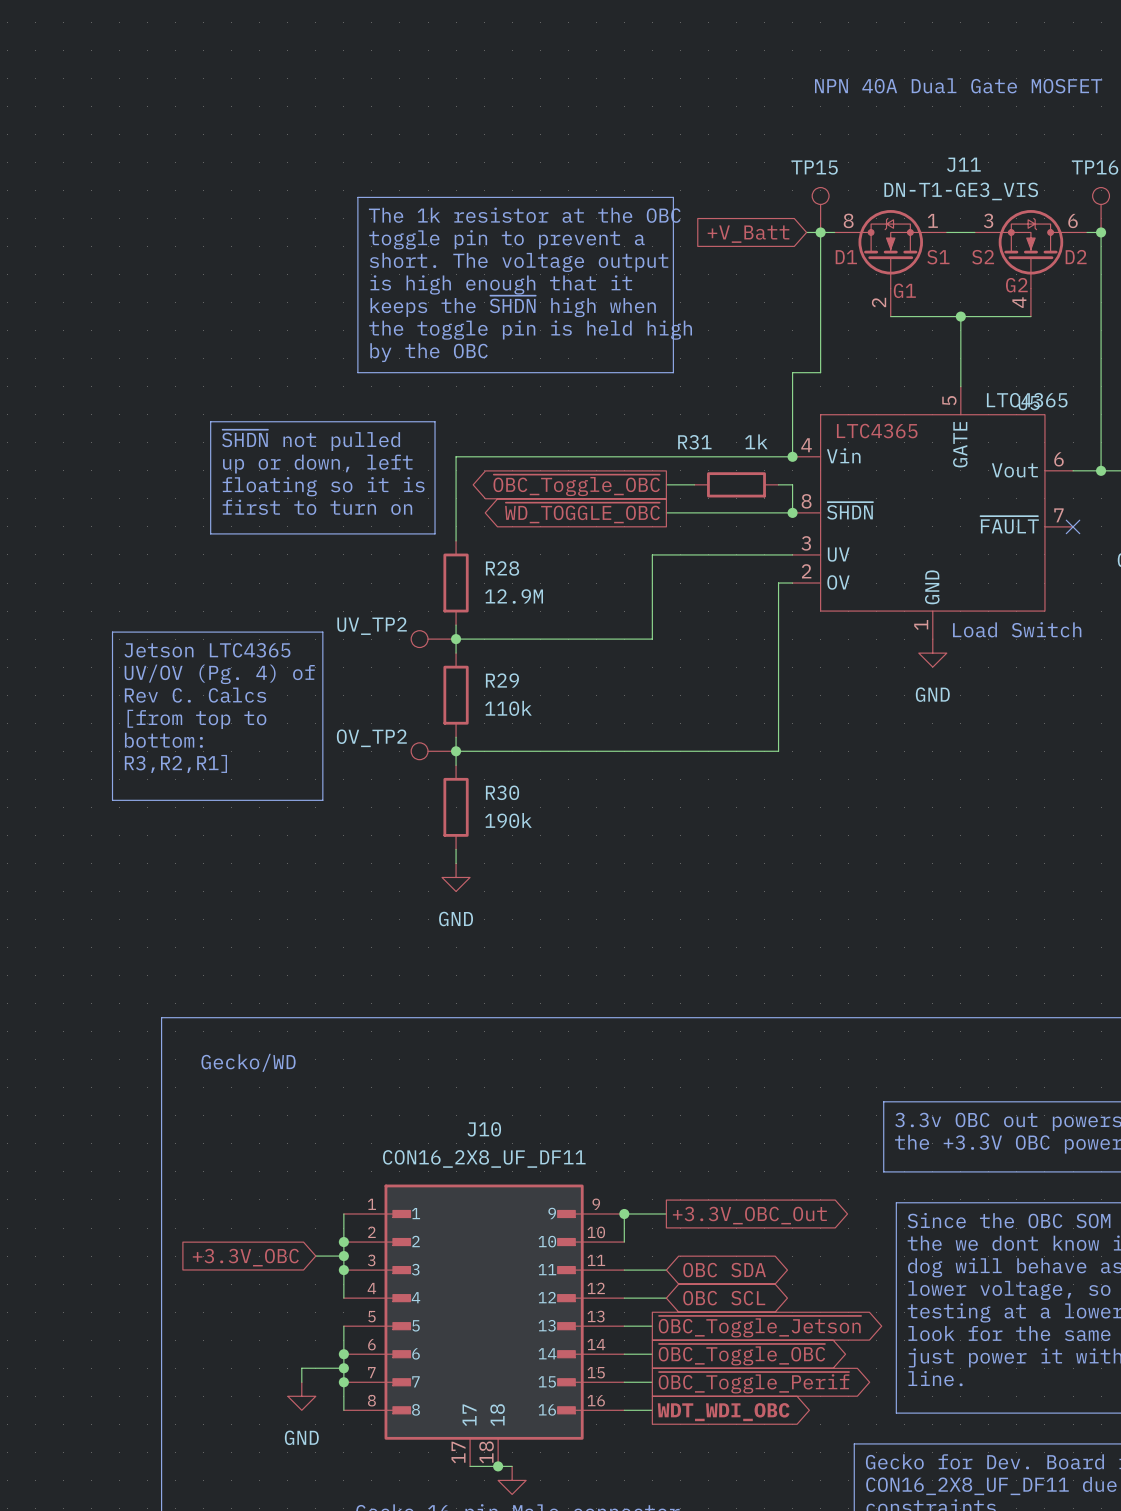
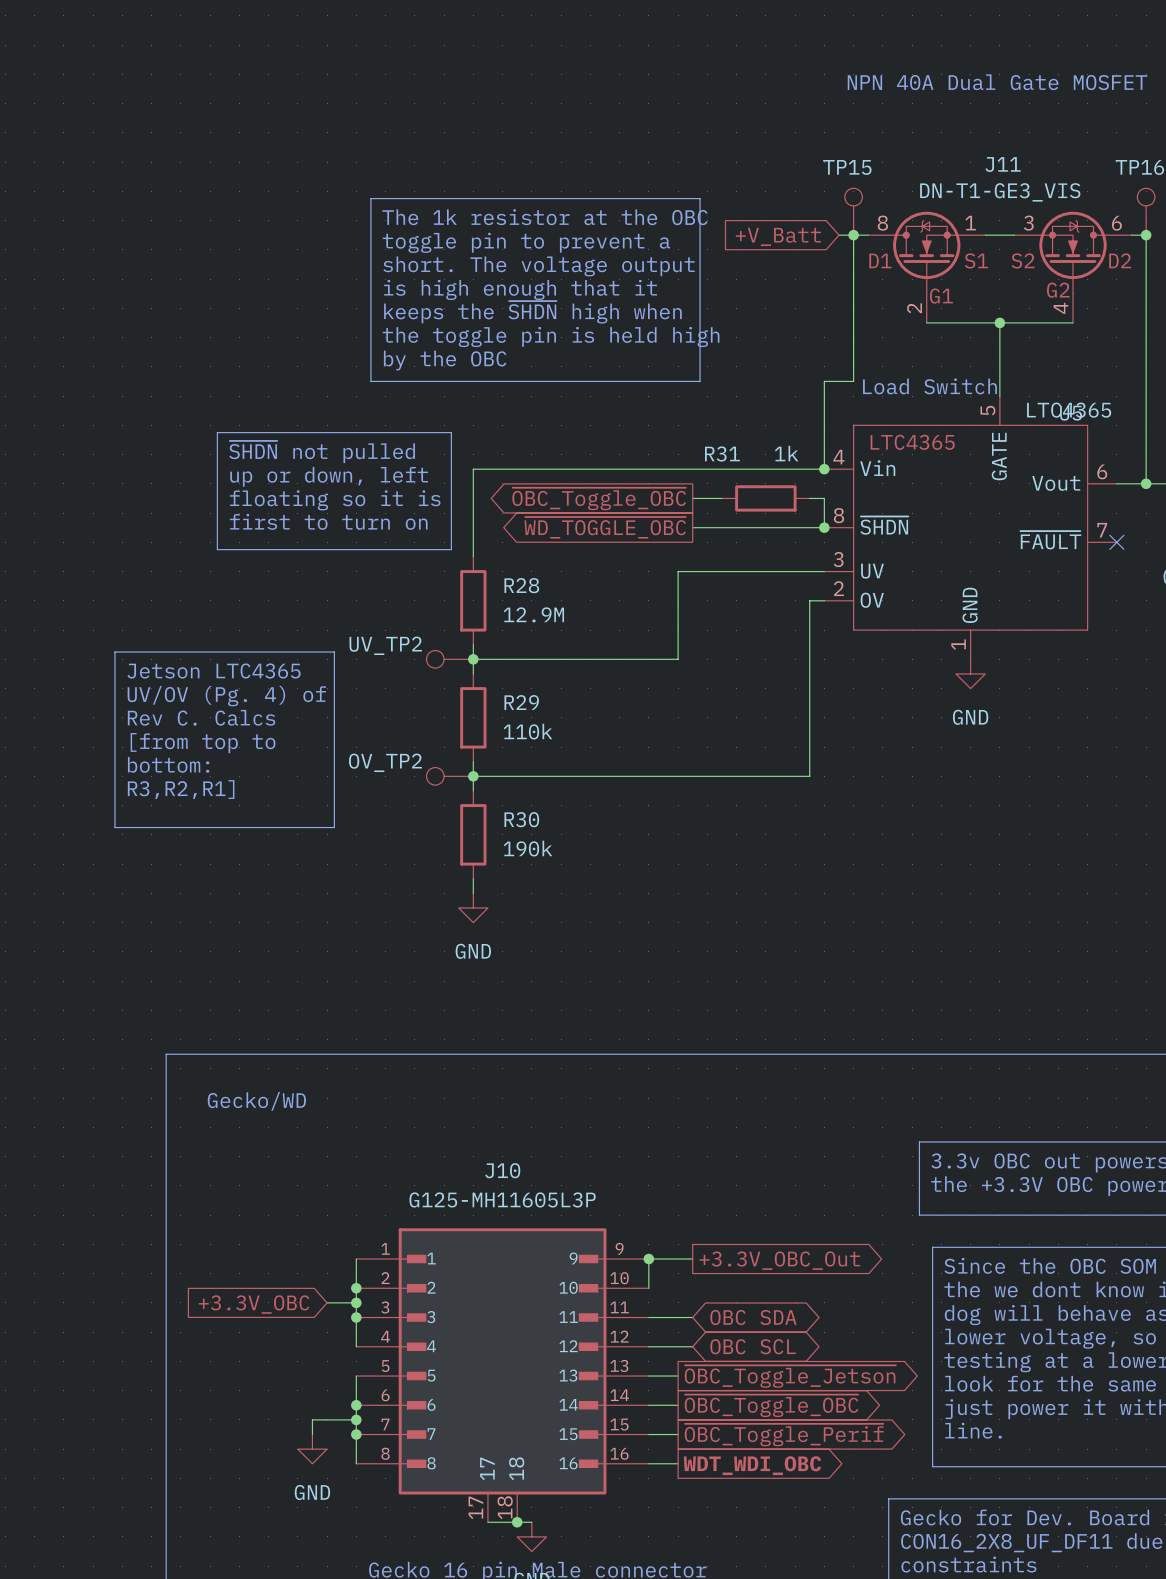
text: none -> Load Switch (929, 386)
text: Load Switch (1017, 629) -> none
J10 value: CON16_2X8_UF_DF11 (484, 1158) -> G125-MH11605L3P (502, 1199)

